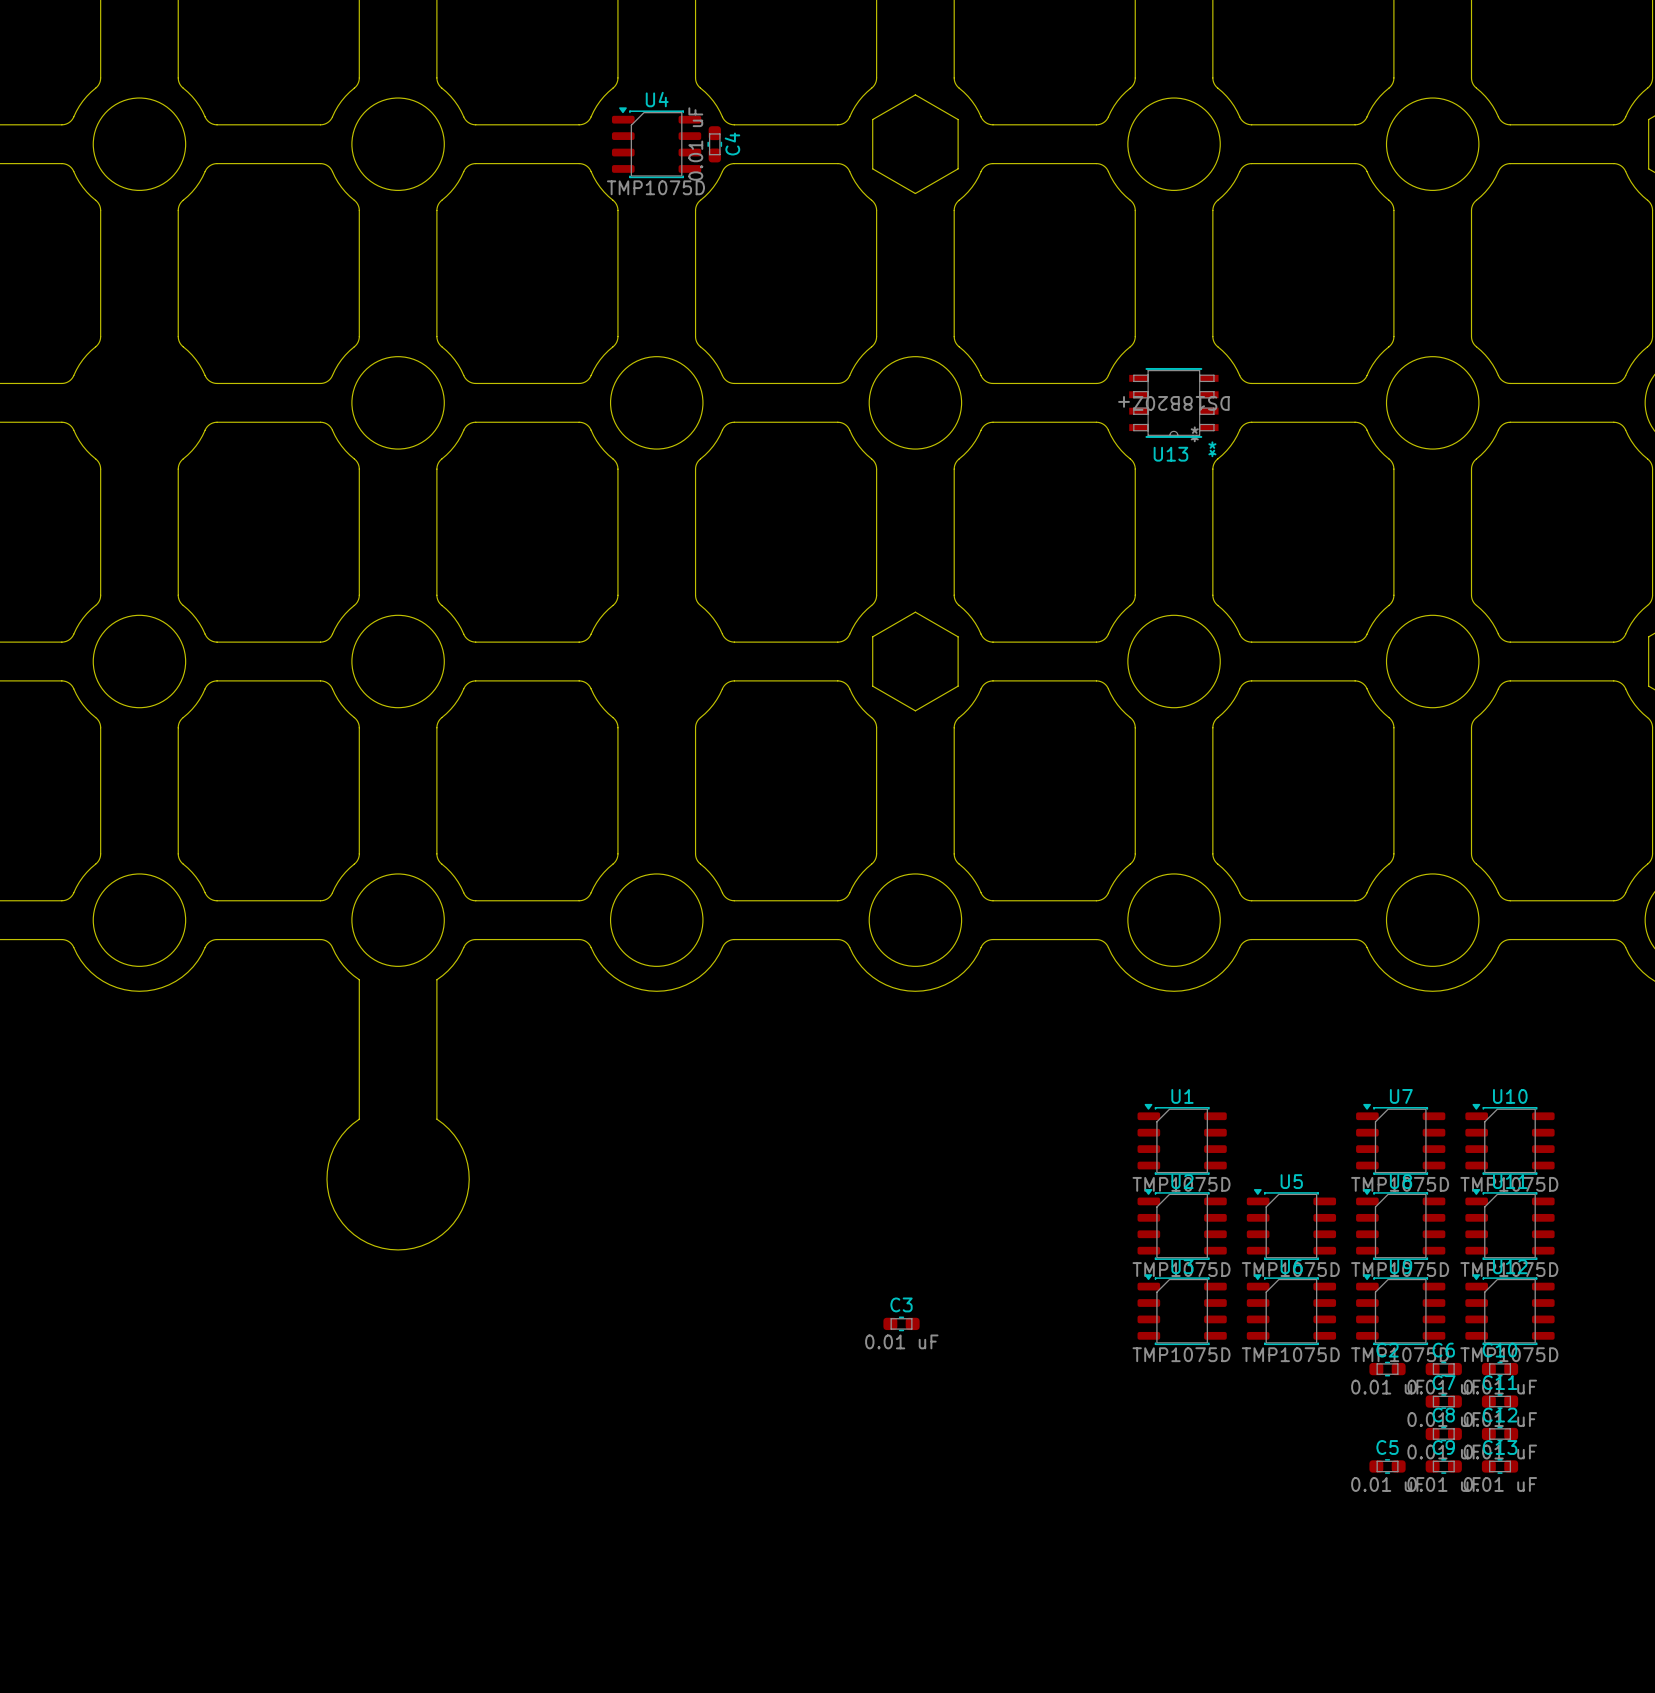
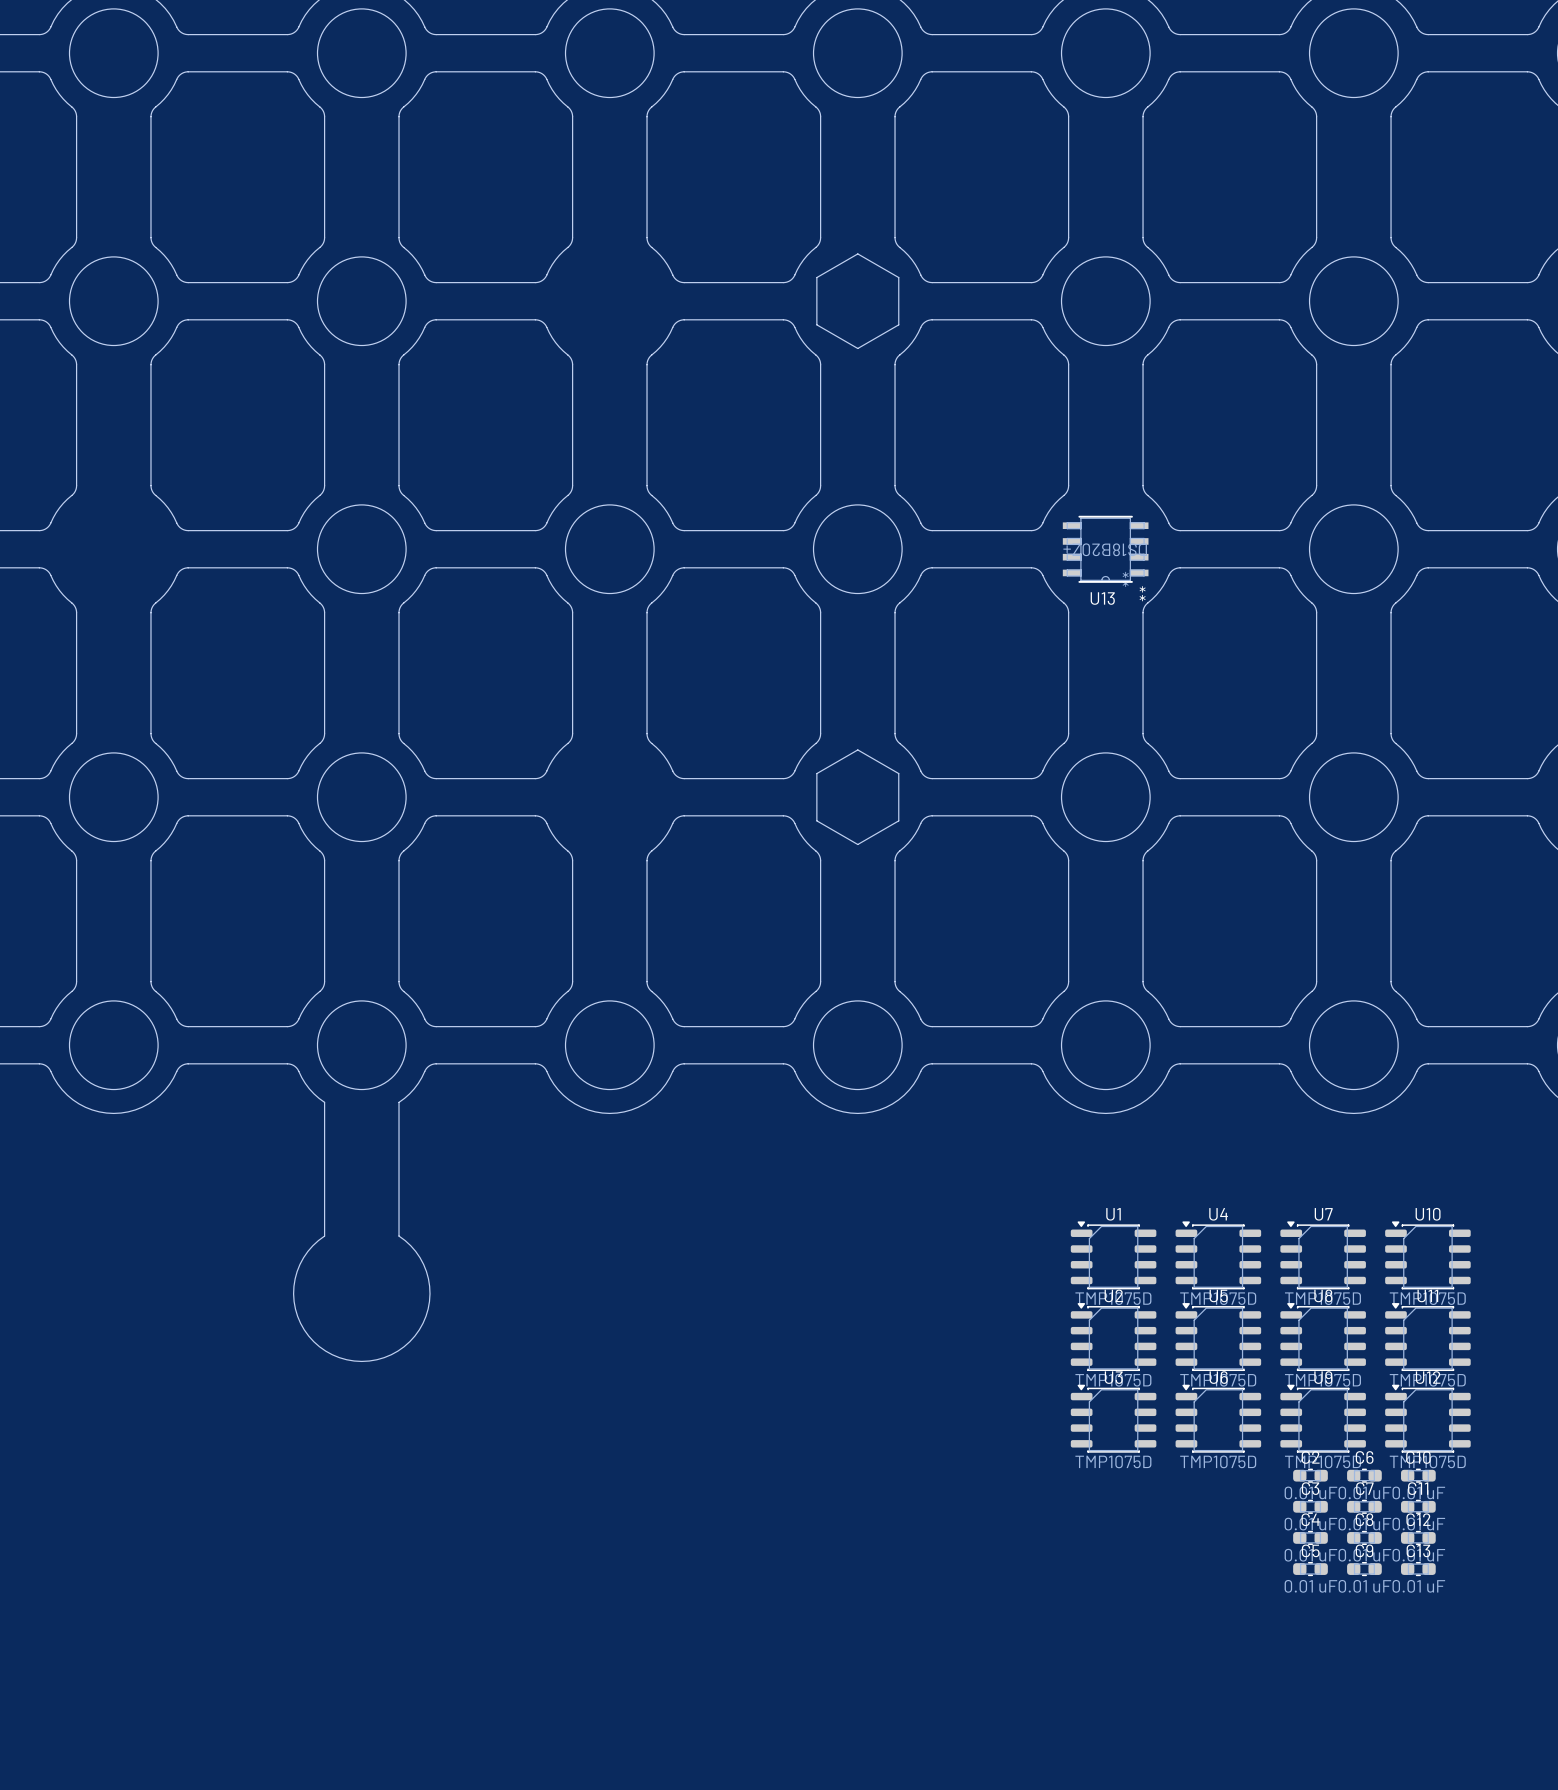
U4 position: (656, 142) -> (1218, 1255)
C4 value position: 0.01 uF (695, 144) -> 0.01 uF (1310, 1555)
C4 rotation: 0° (714, 144) -> 90° clockwise (1310, 1537)
C4 position: (714, 144) -> (1310, 1537)
C4 name position: C4 (732, 144) -> C4 (1310, 1519)
C3 position: (901, 1323) -> (1310, 1506)

